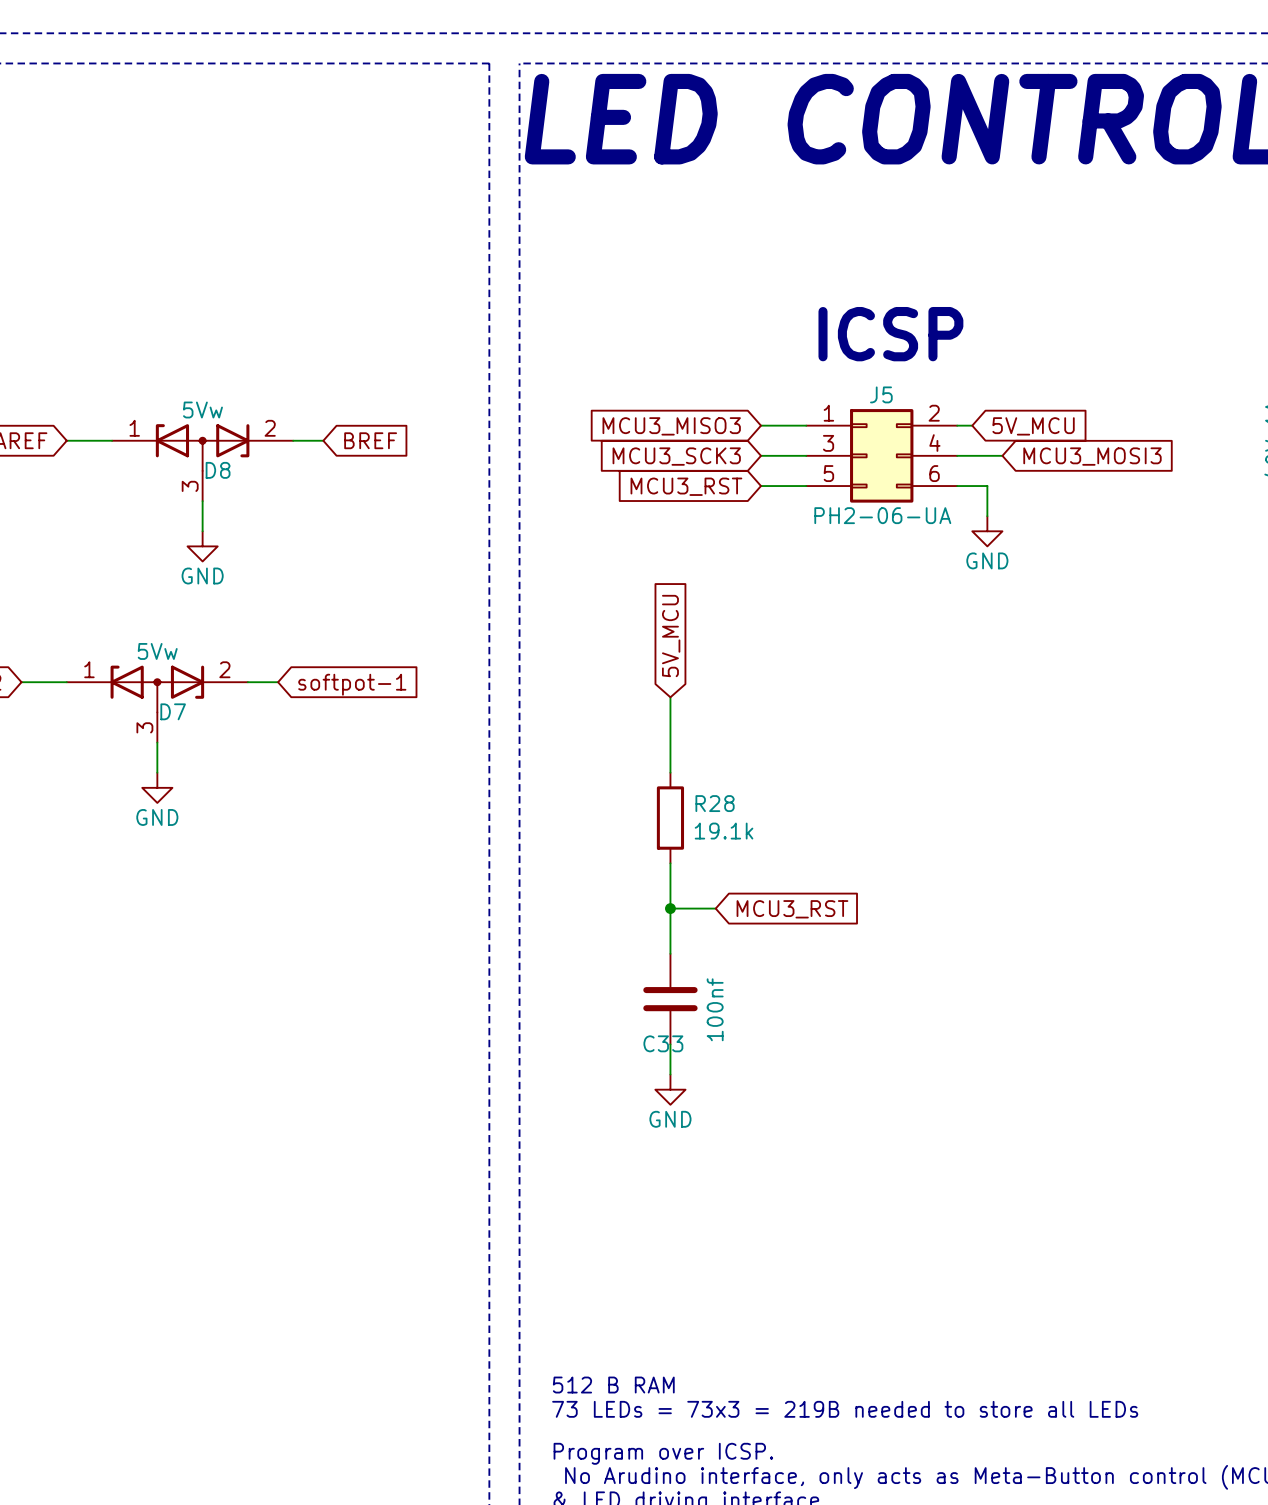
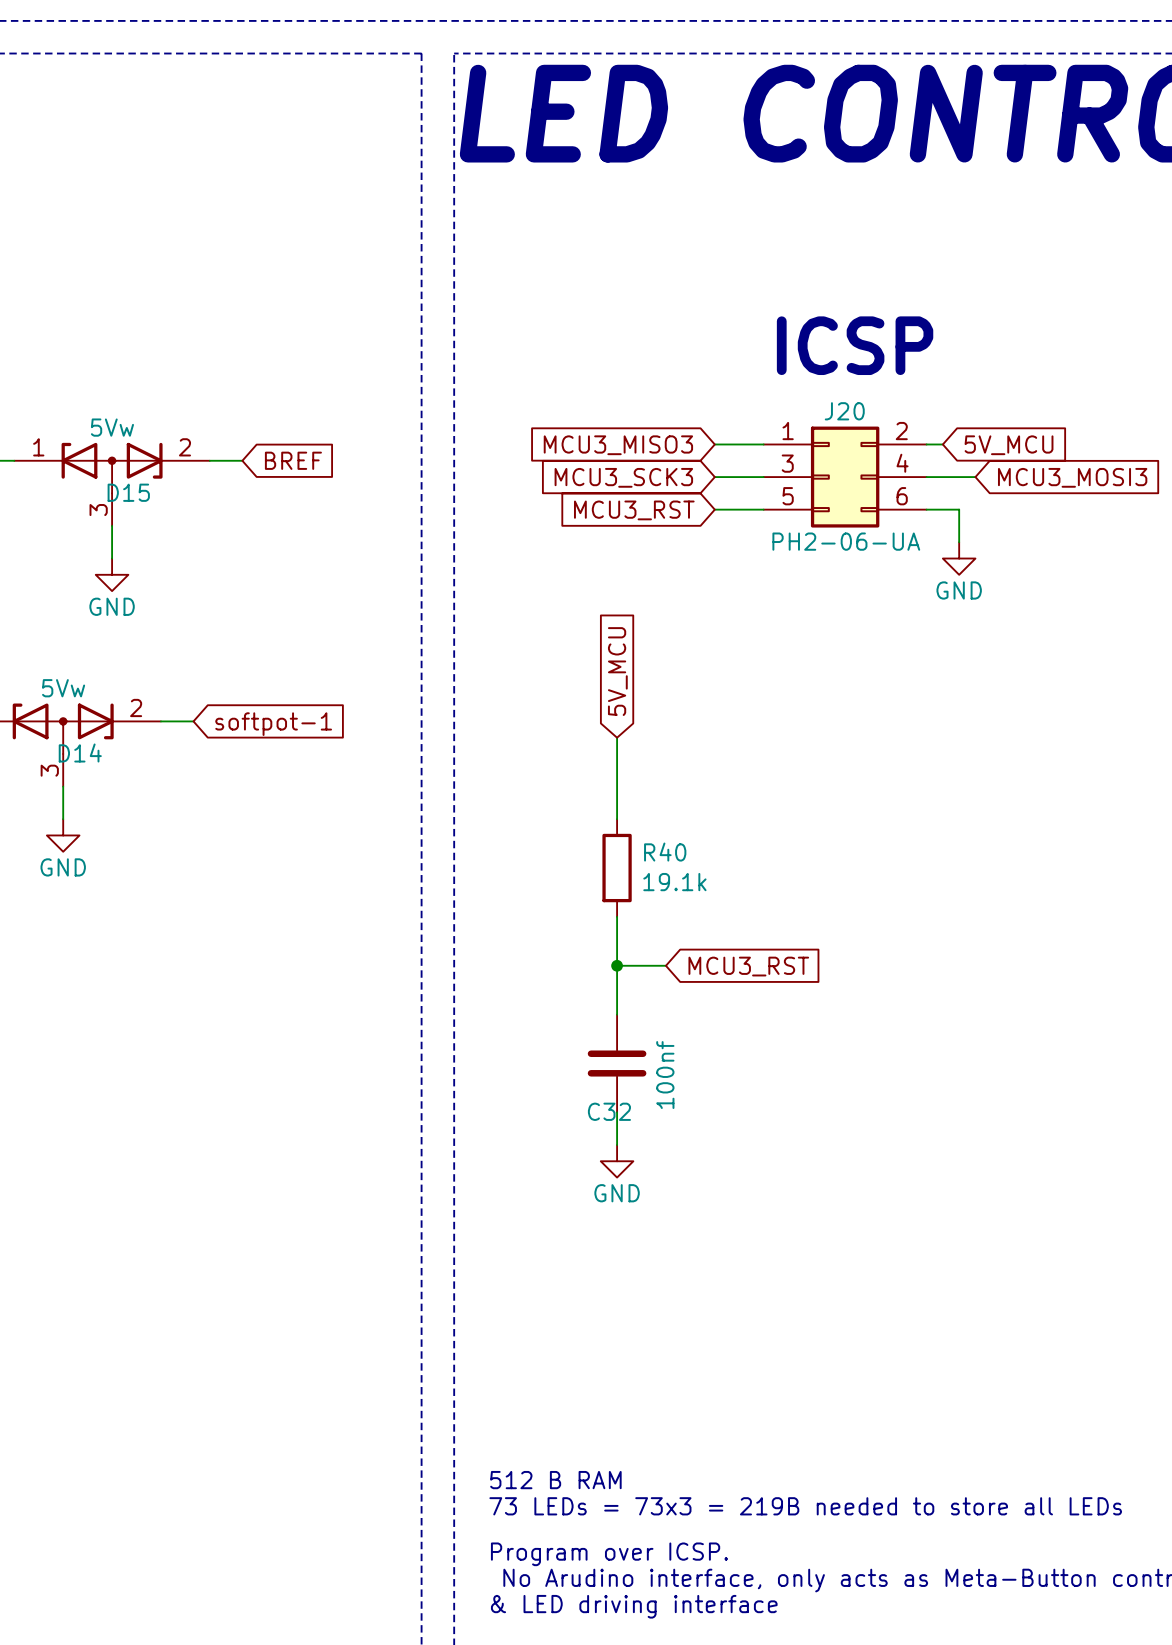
J5 name: J5 (881, 394) -> J20 (844, 411)
D8 name: D8 (218, 470) -> D15 (128, 492)
D7 name: D7 (173, 711) -> D14 (80, 753)
R28 name: R28 (715, 803) -> R40 (665, 852)
C33 name: C33 (663, 1043) -> C32 (609, 1111)

